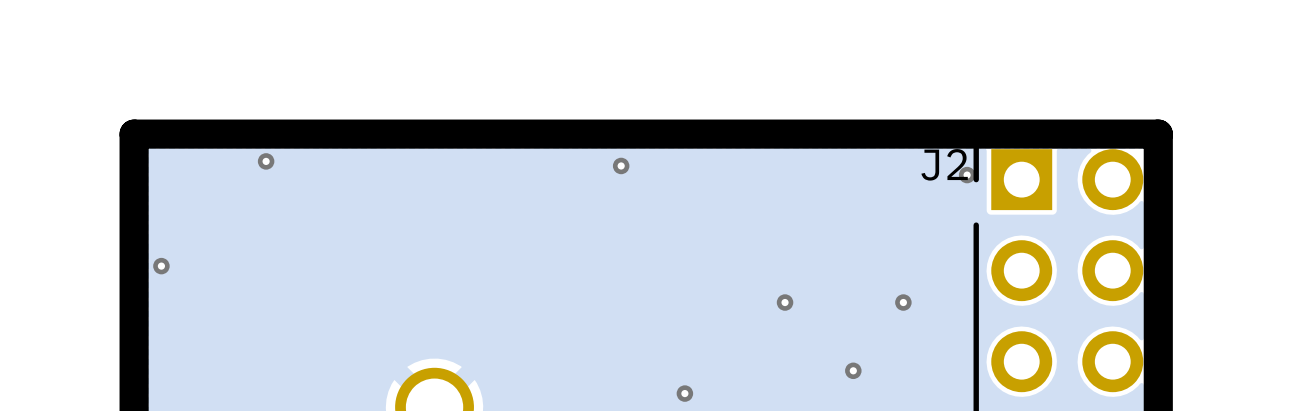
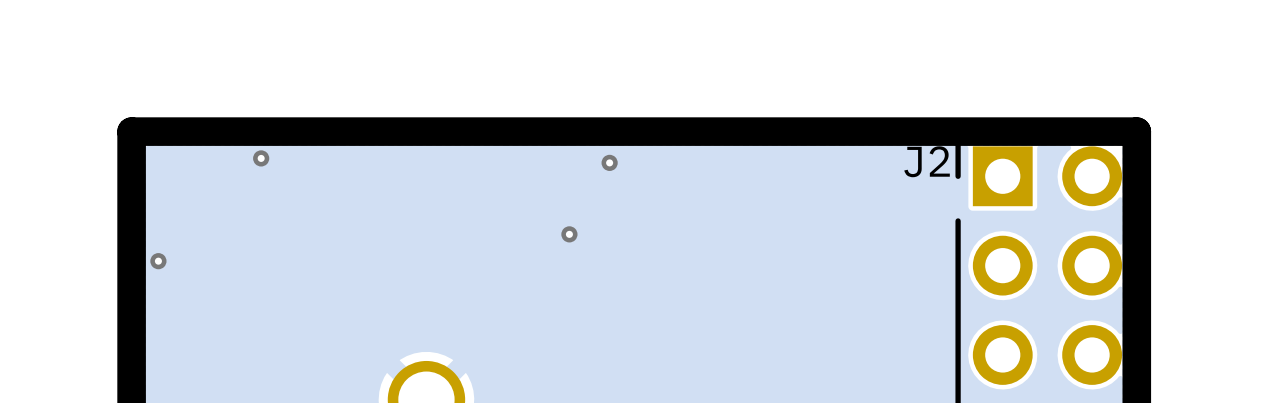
via: (967, 175) -> none
via: none -> (569, 234)
via: (785, 302) -> none
via: (903, 302) -> none
via: (853, 370) -> none
via: (684, 393) -> none

